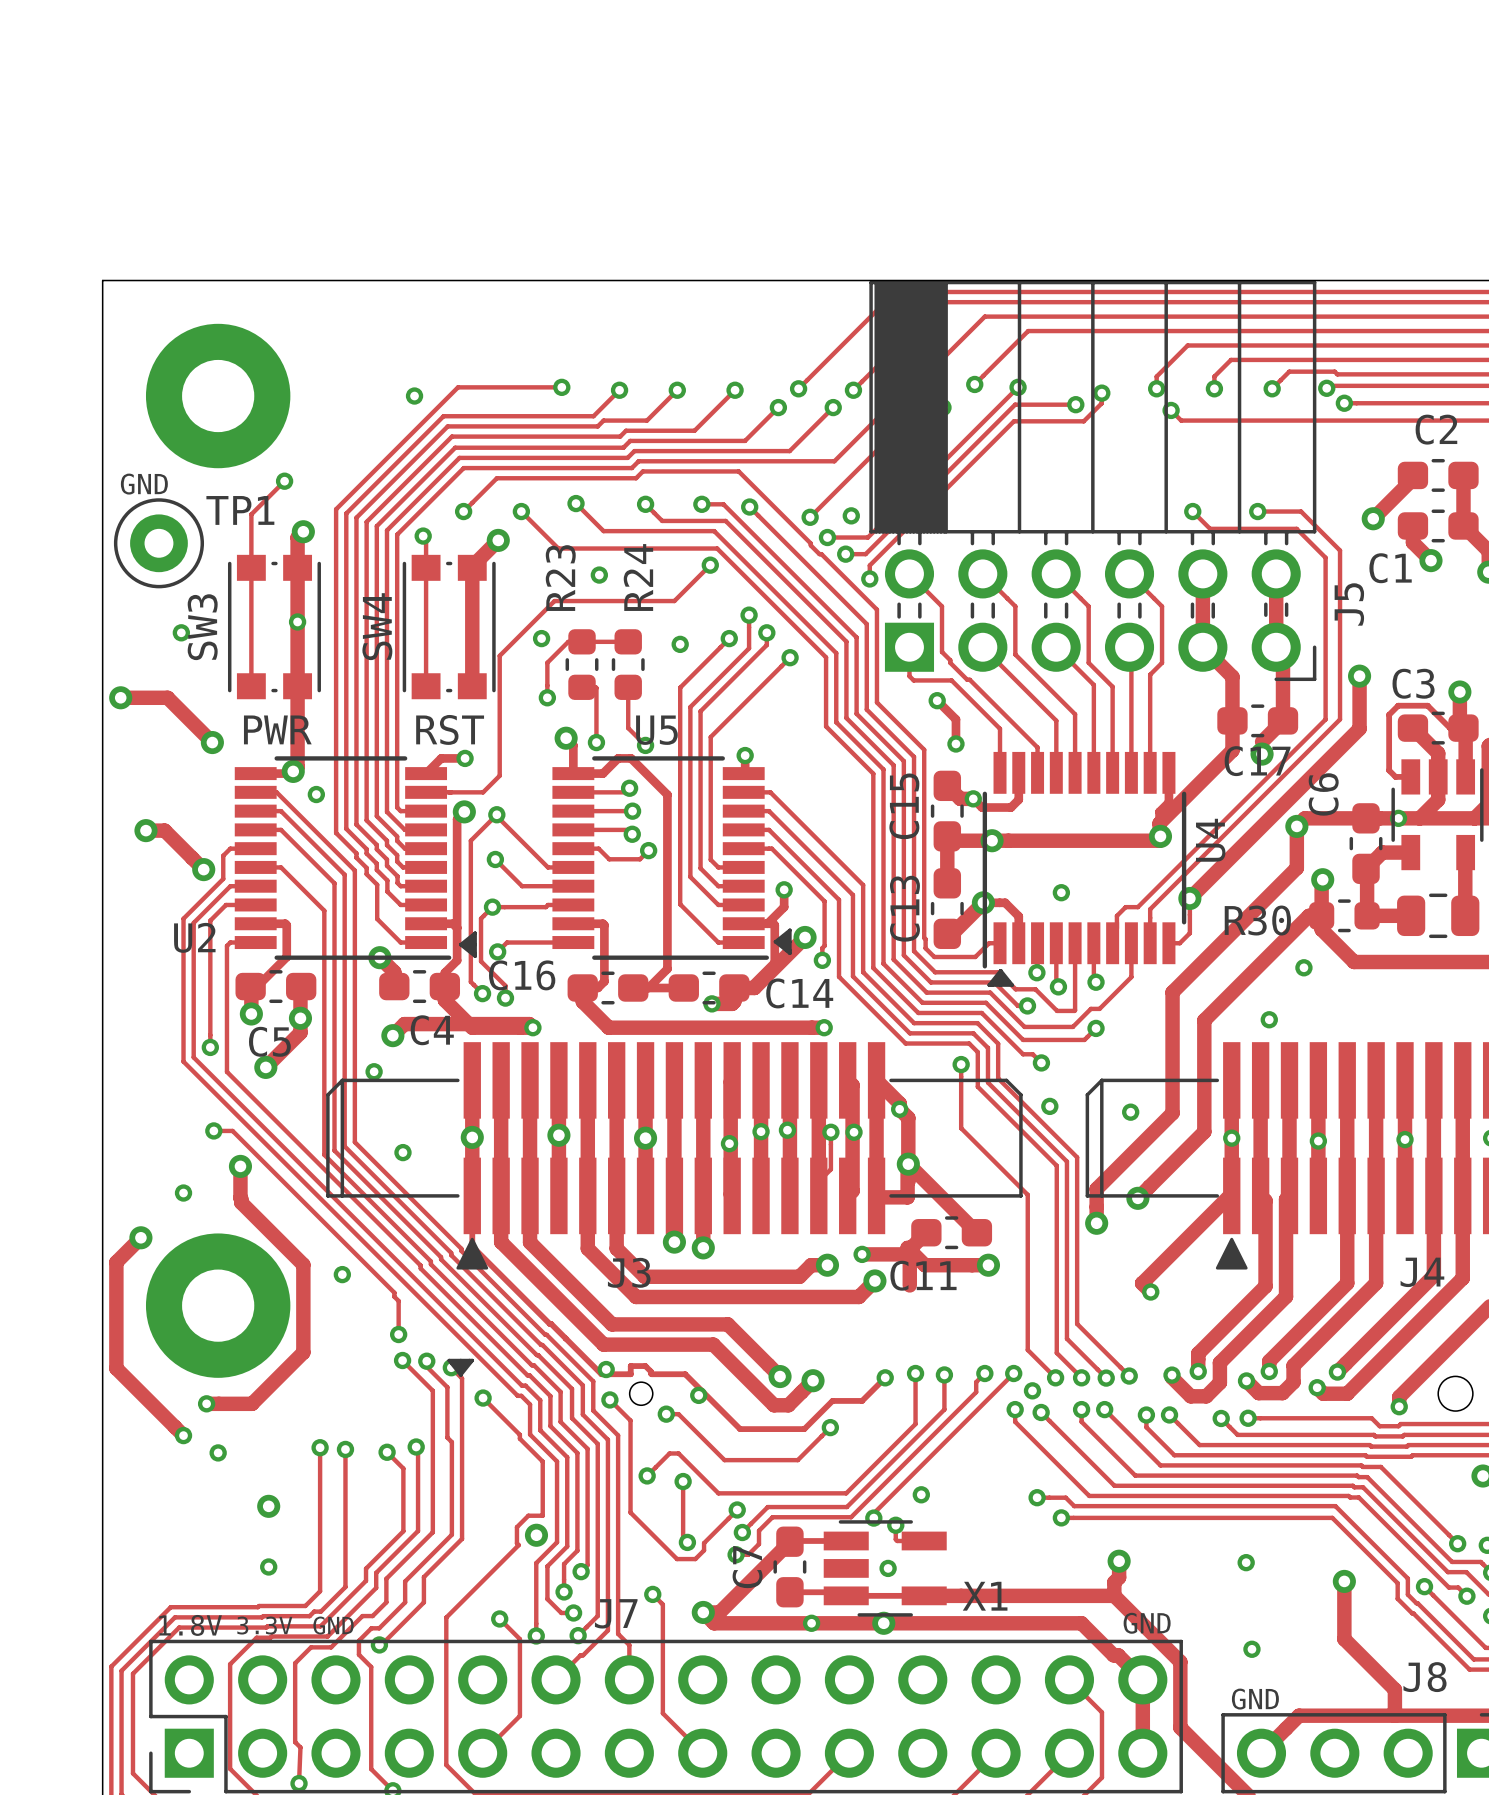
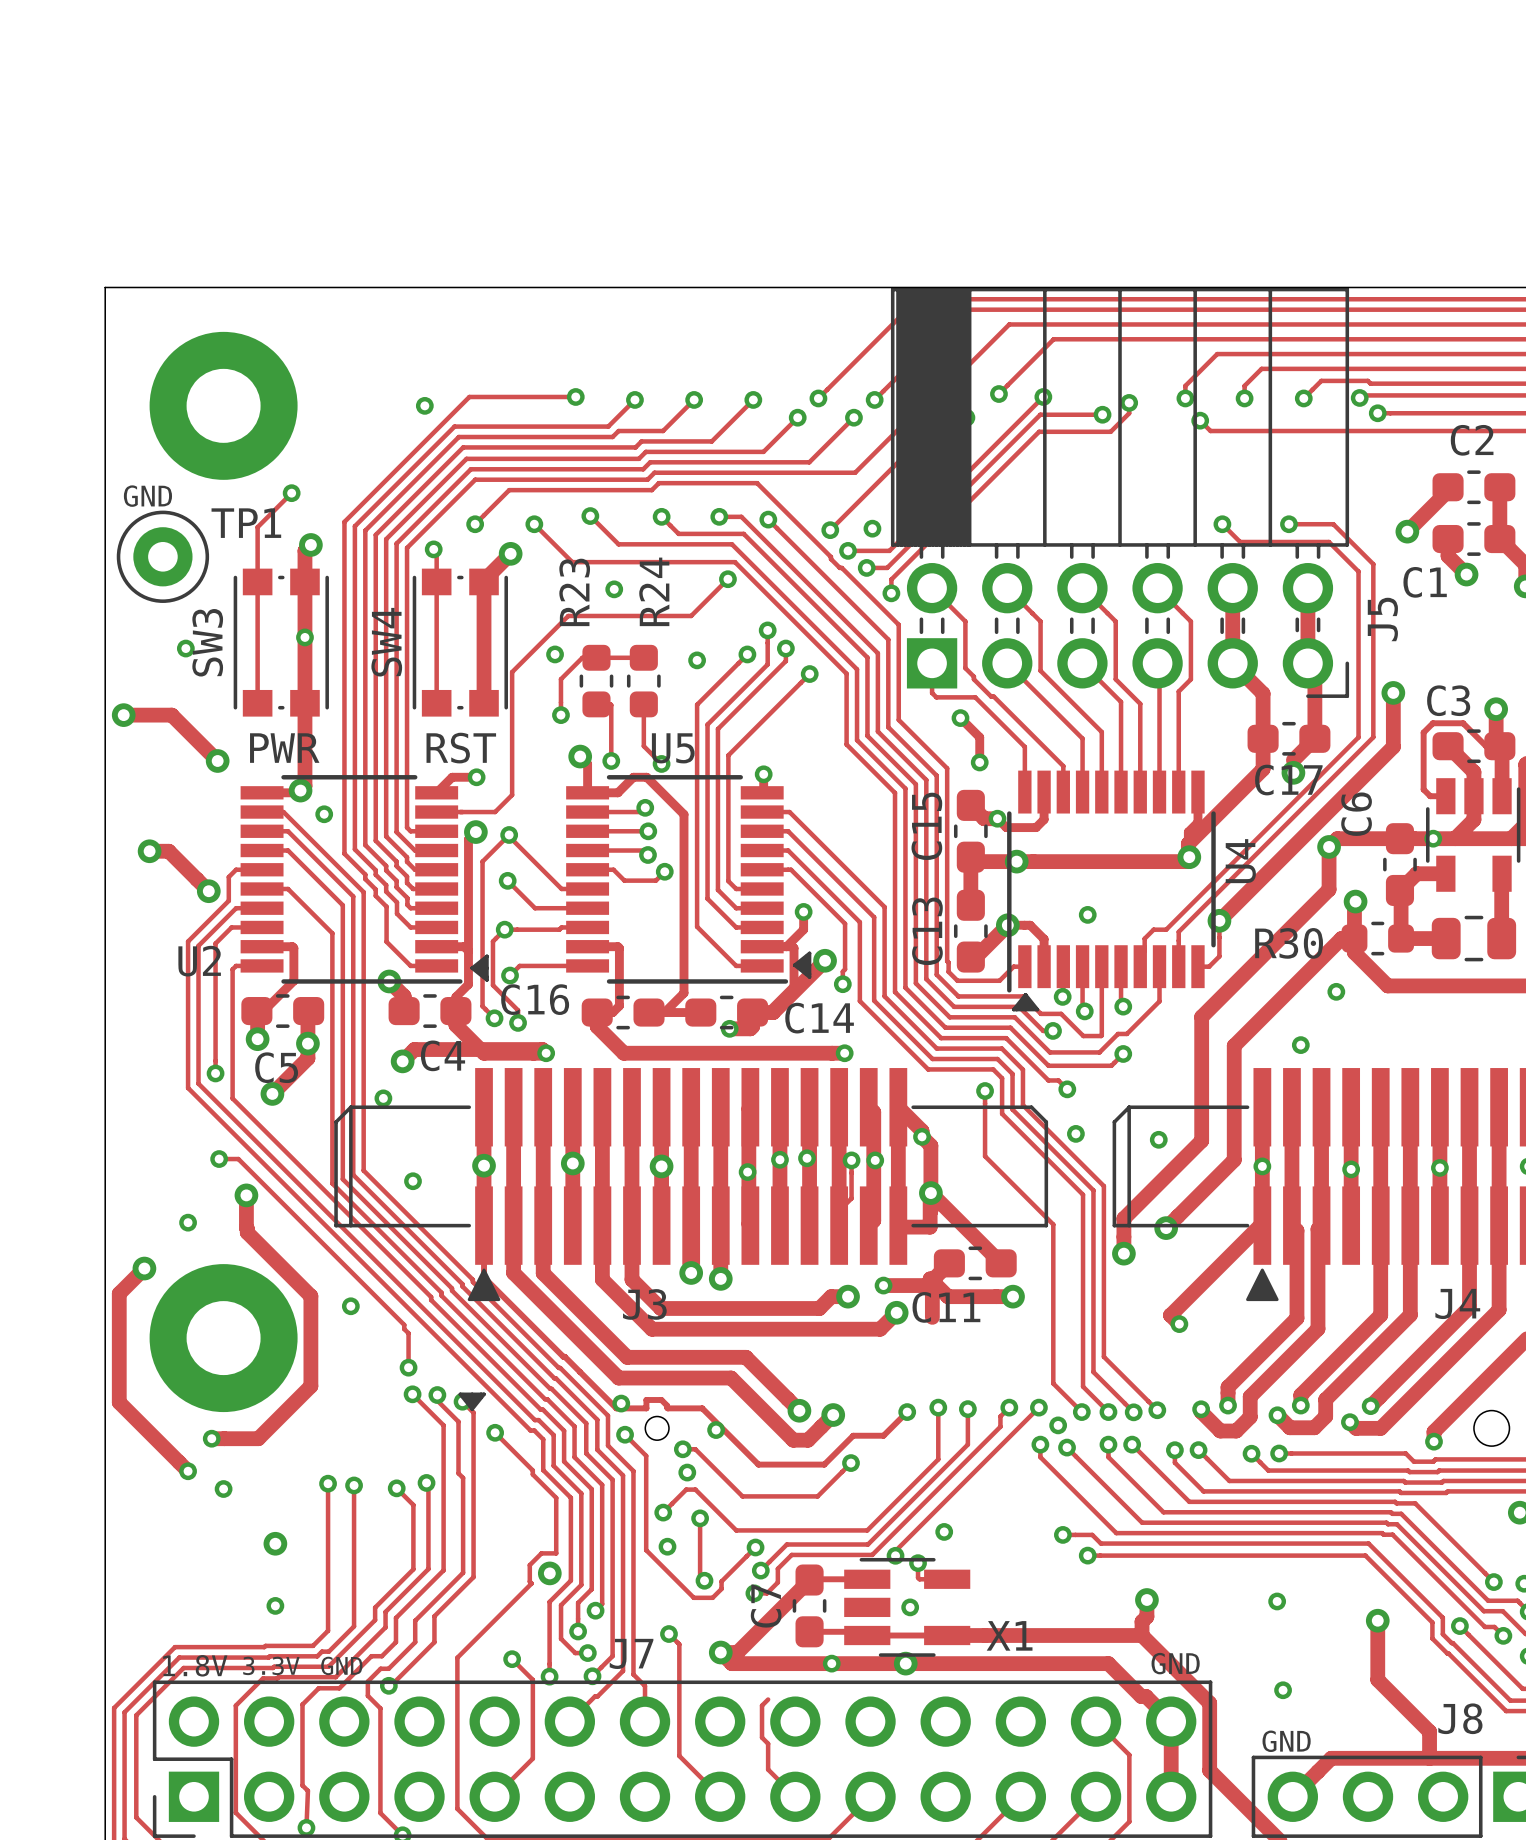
via: none -> (687, 1472)
via: none -> (667, 1546)
track: none -> (768, 1699) (762, 1705) (762, 1737) (768, 1743) (768, 1769) (795, 1796)

